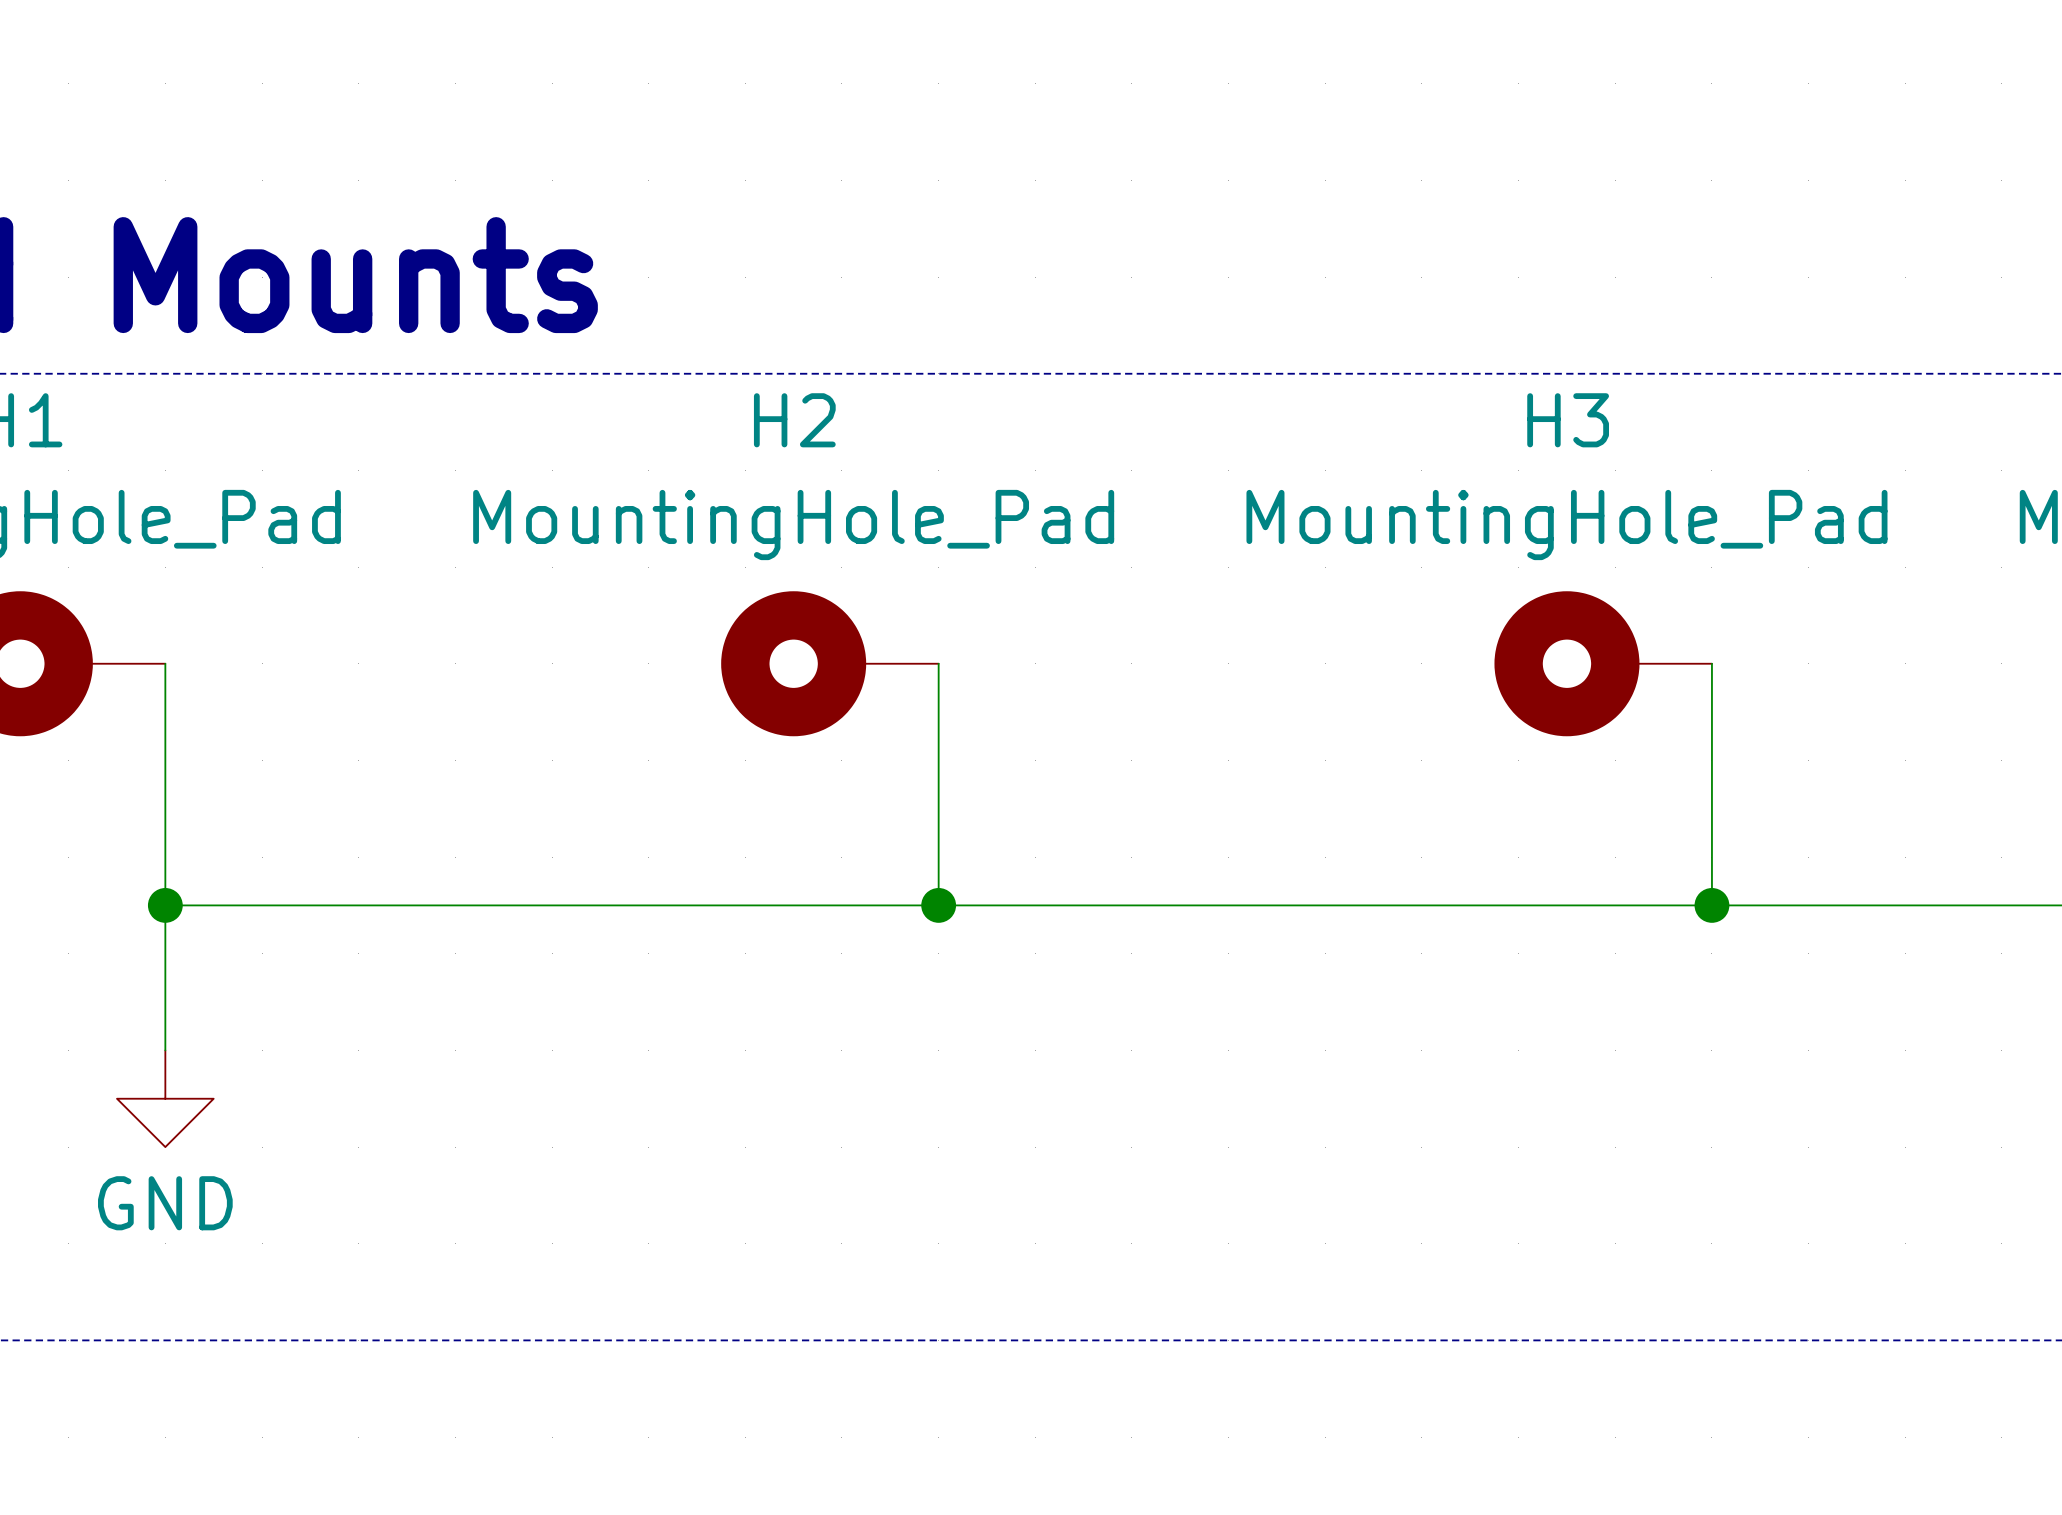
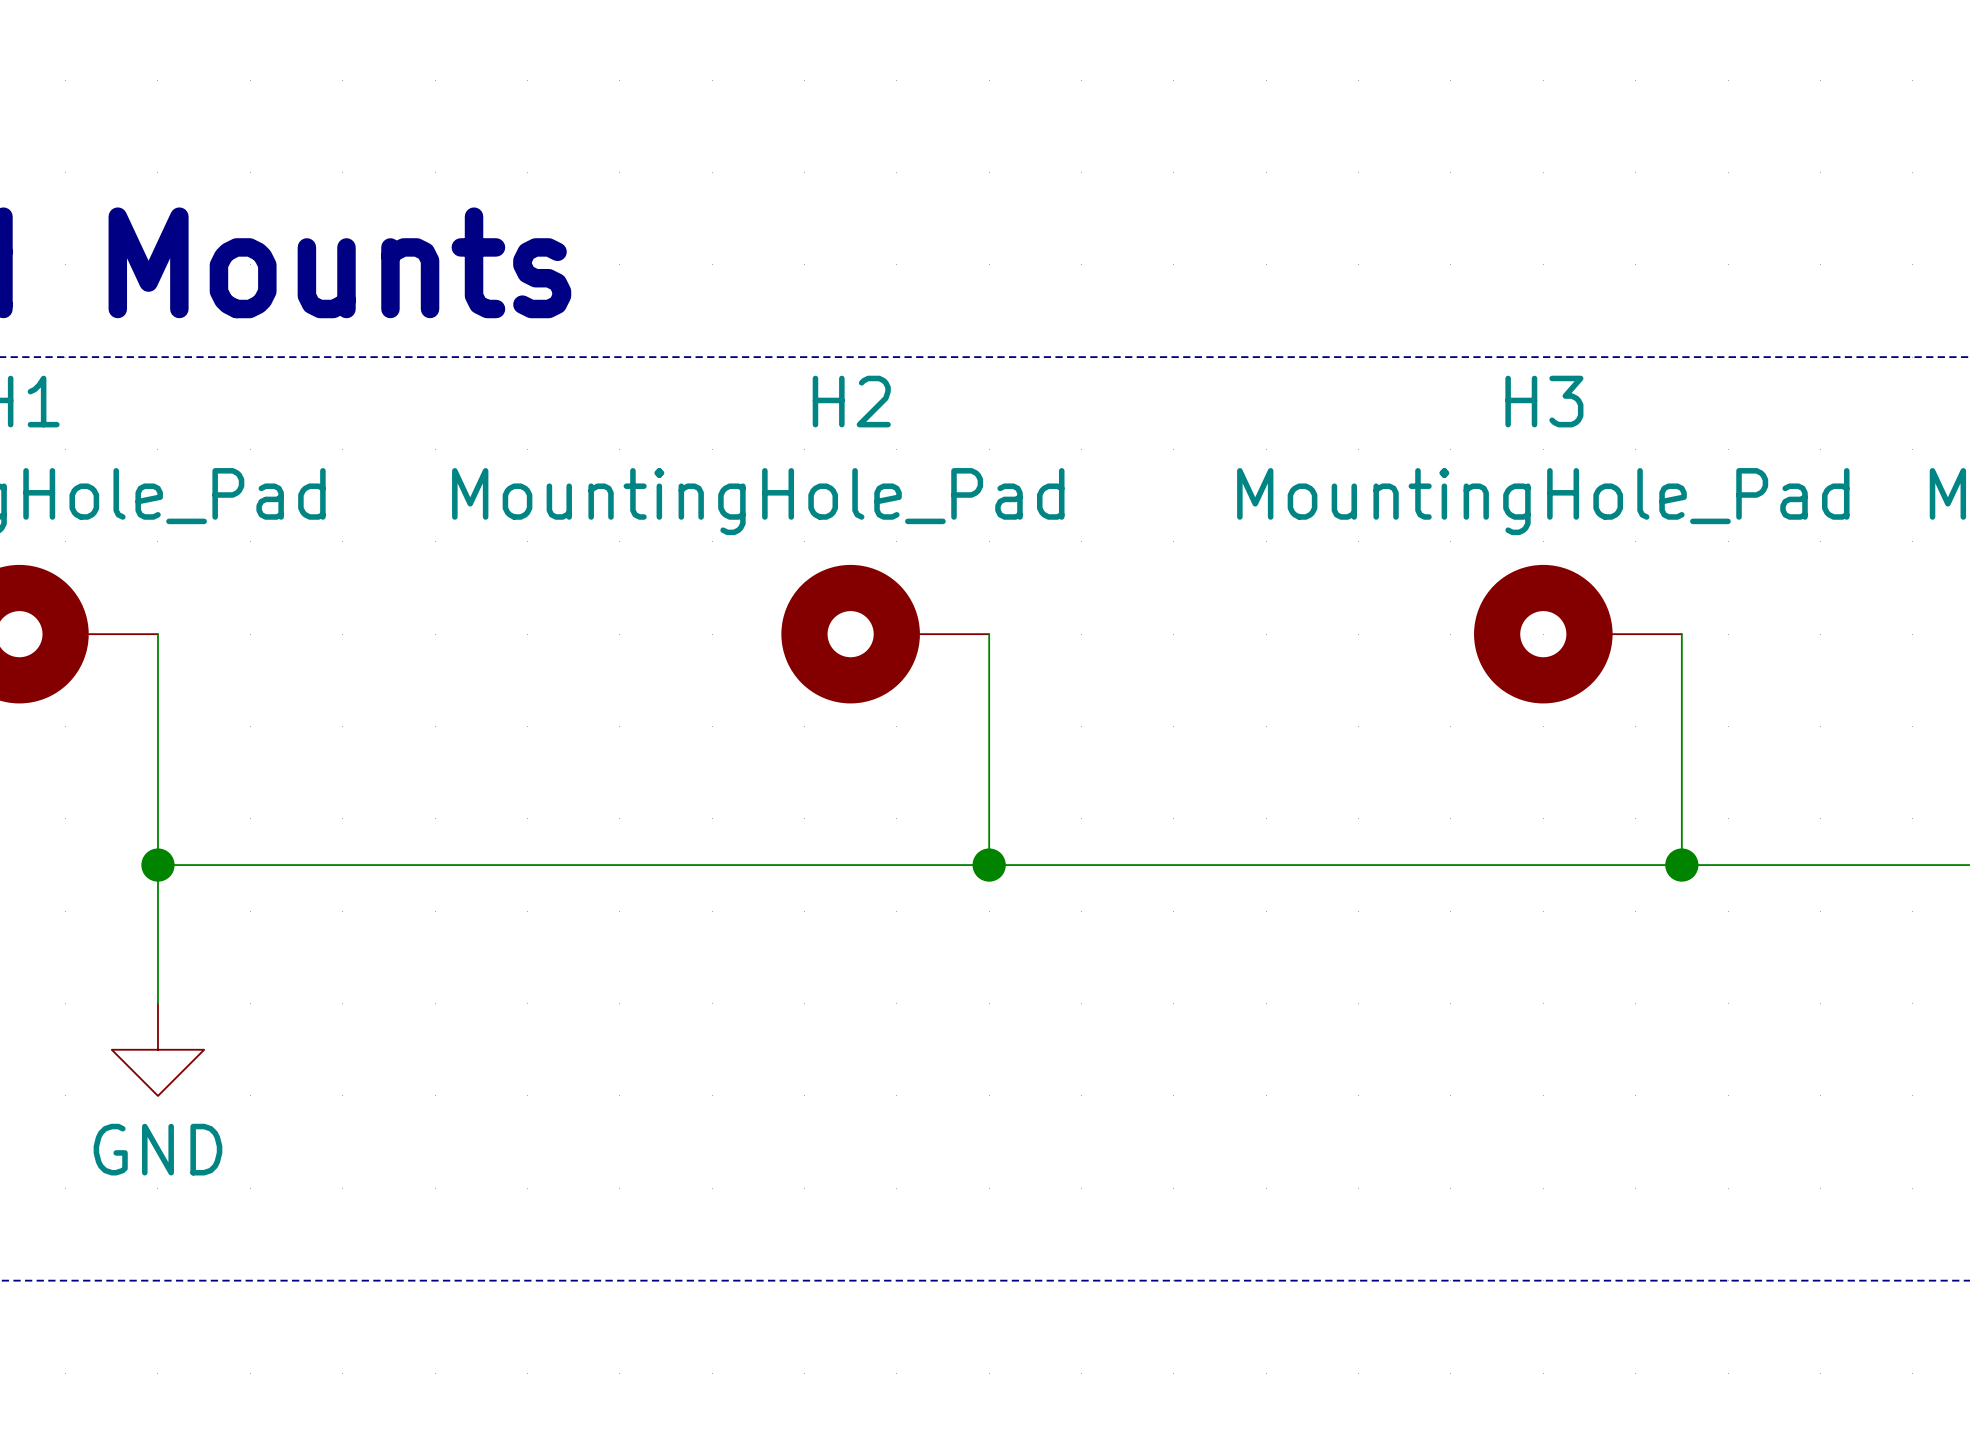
H2 position: (829, 663) -> (885, 634)
wire: (938, 663) (938, 905) -> (989, 634) (989, 865)
H3 position: (1603, 663) -> (1577, 634)
wire: (1711, 663) (1711, 905) -> (1681, 634) (1681, 865)
junction position: (938, 905) -> (989, 865)
junction position: (1711, 905) -> (1681, 865)

